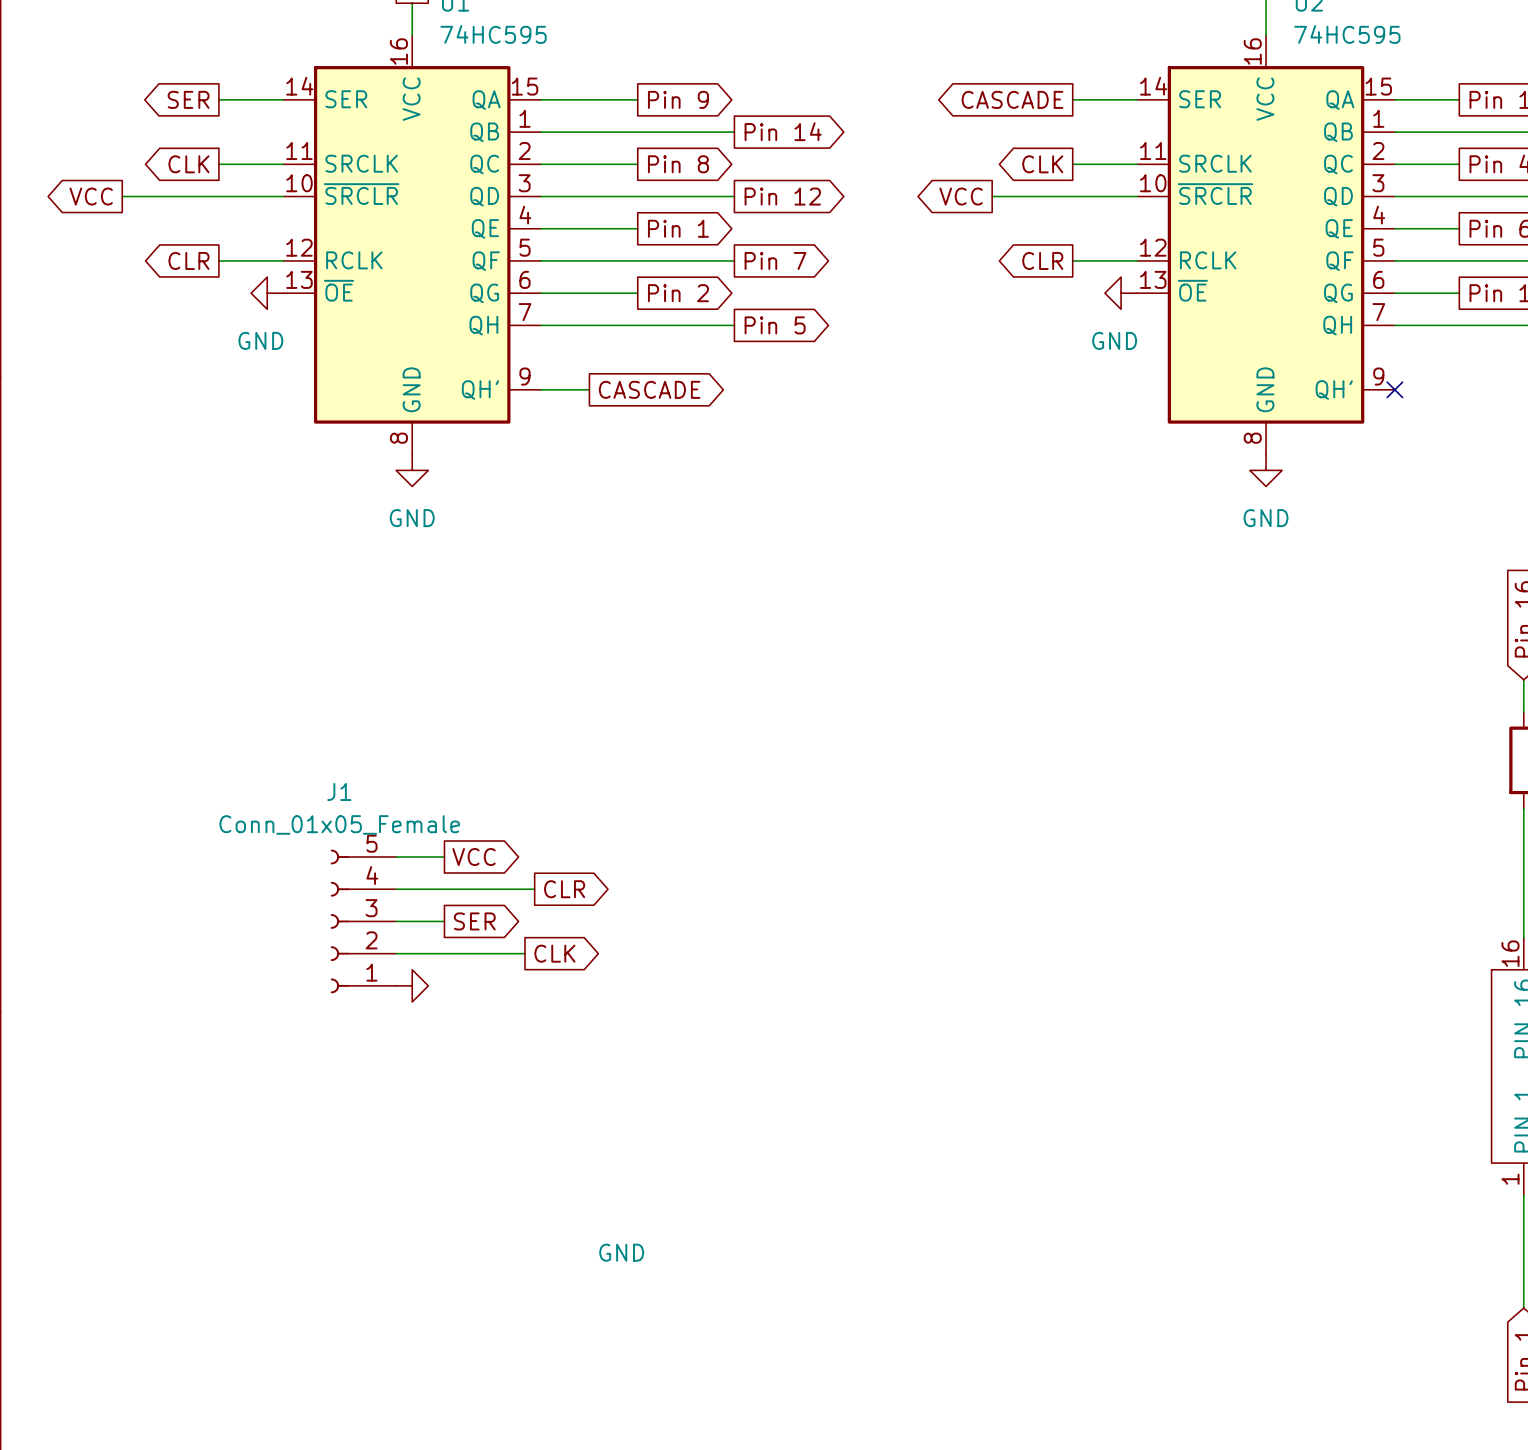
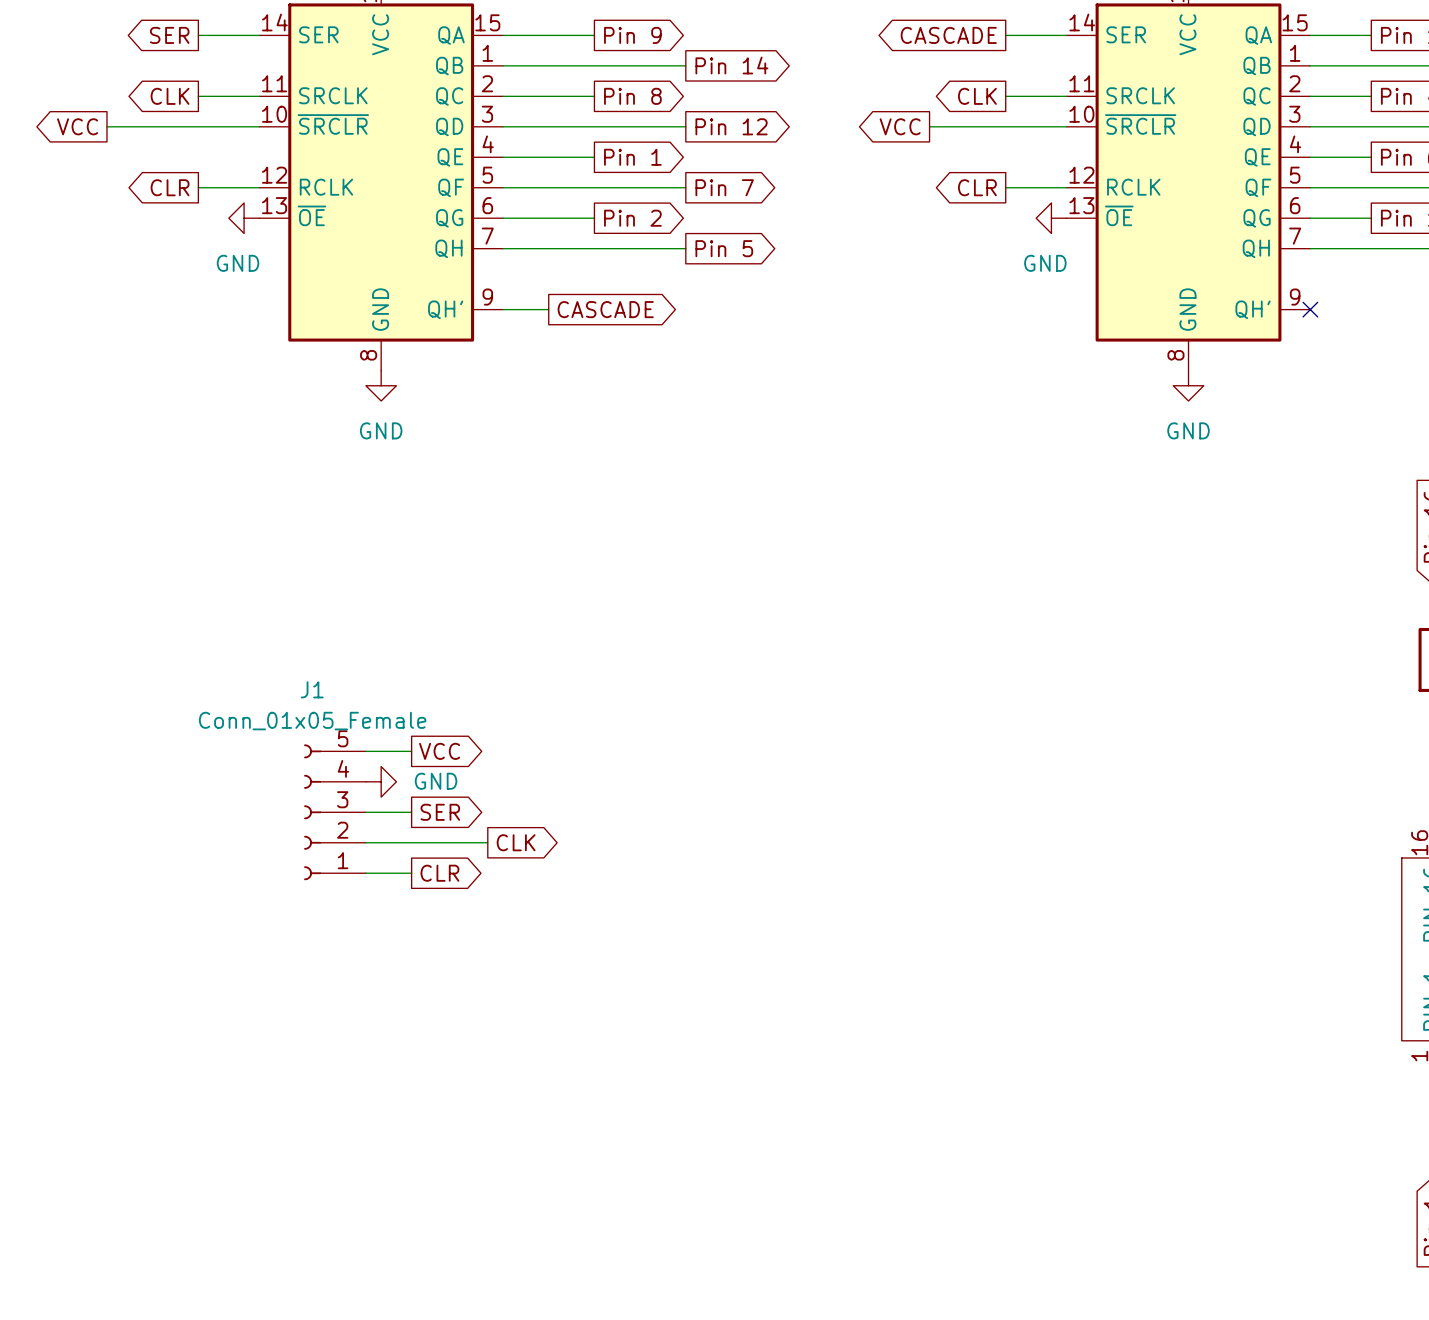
wire: (396, 889) (534, 889) -> none
global label position: CLR (564, 889) -> CLR (439, 873)
wire: none -> (365, 873) (411, 873)
power symbol position: GND (412, 985) -> GND (381, 781)
power symbol text position: GND (621, 1252) -> GND (436, 781)

